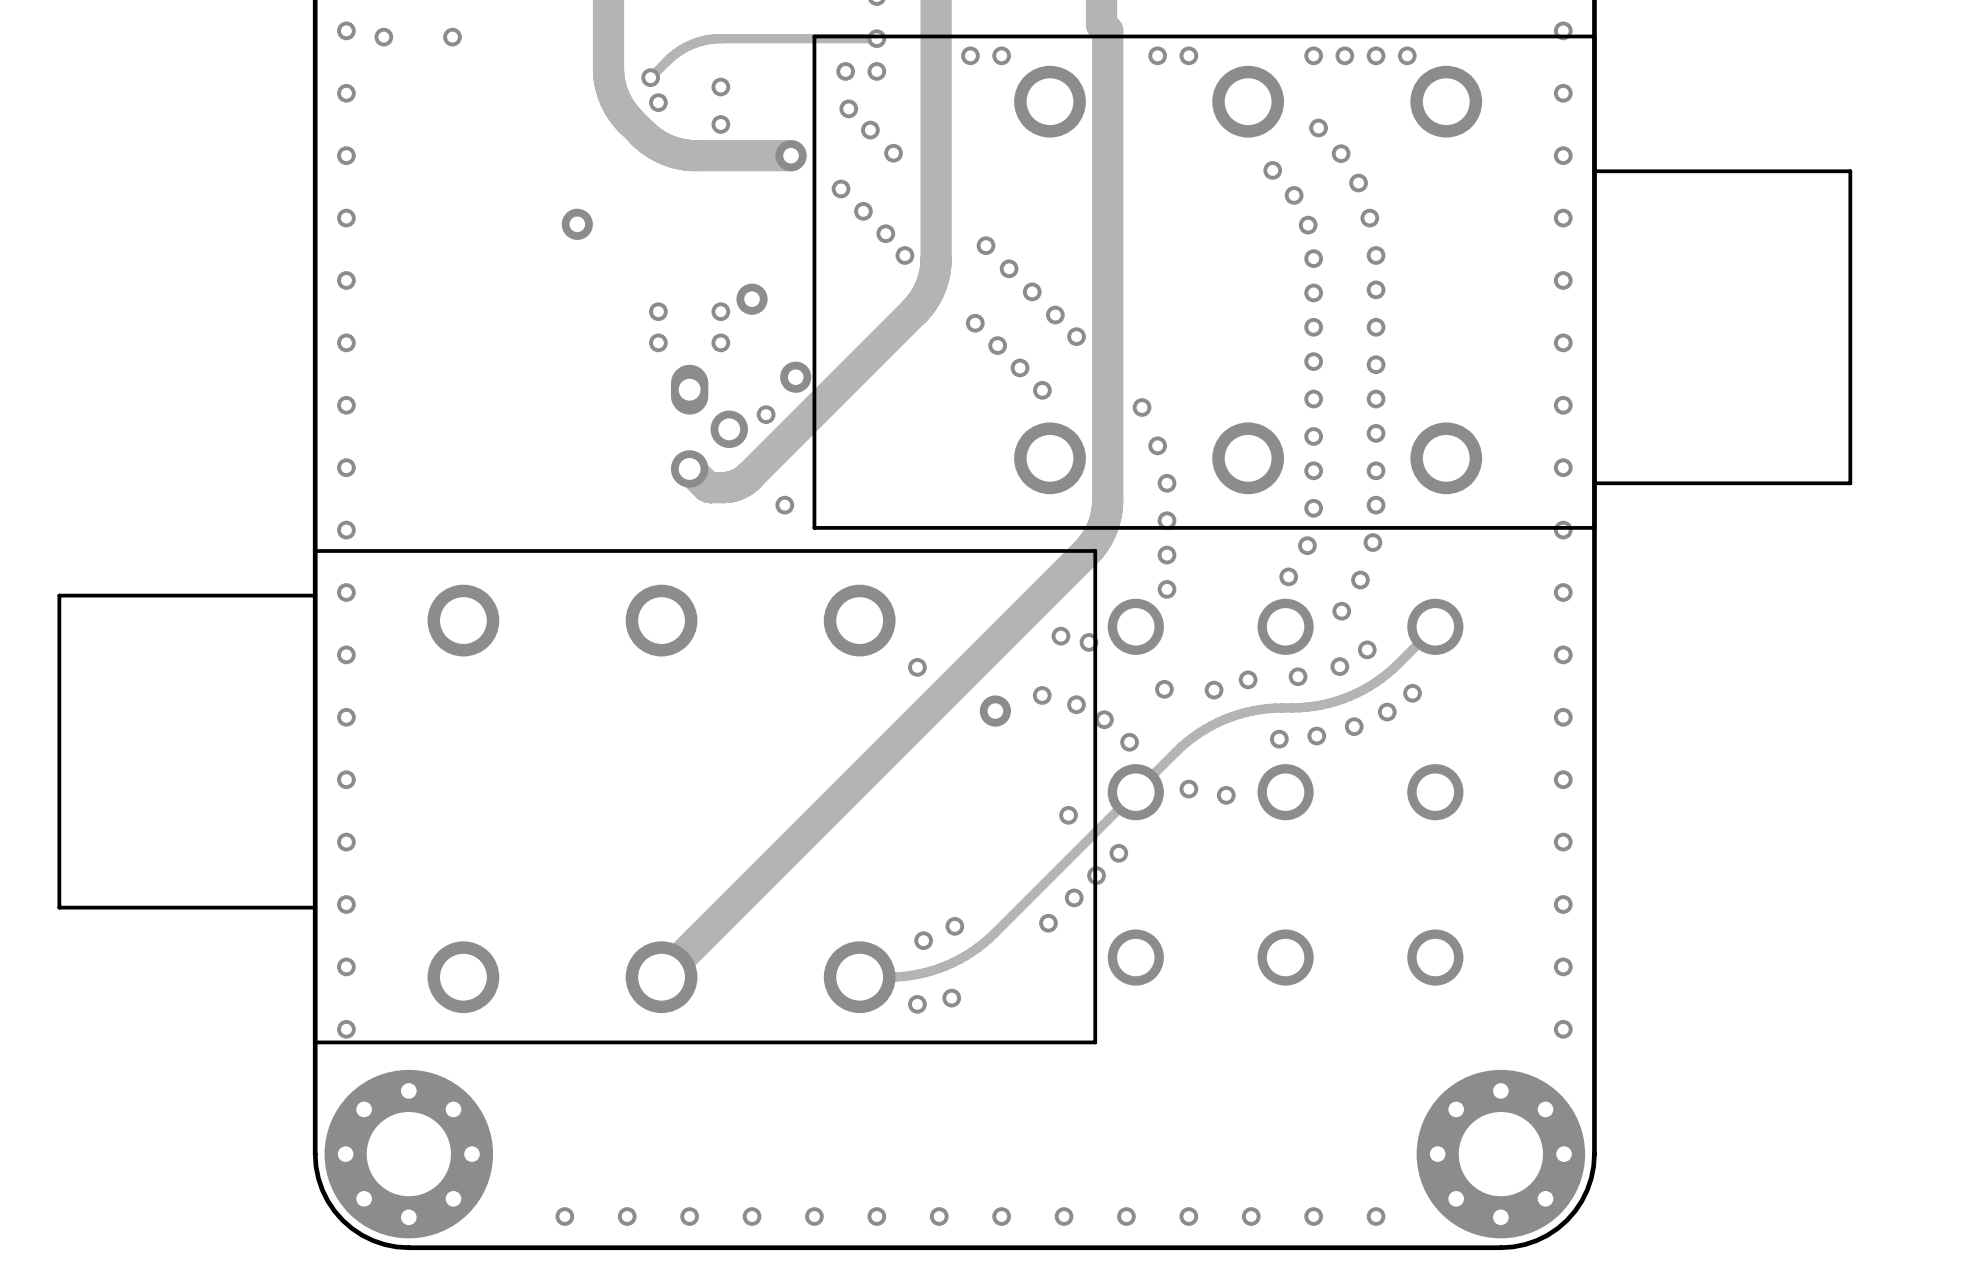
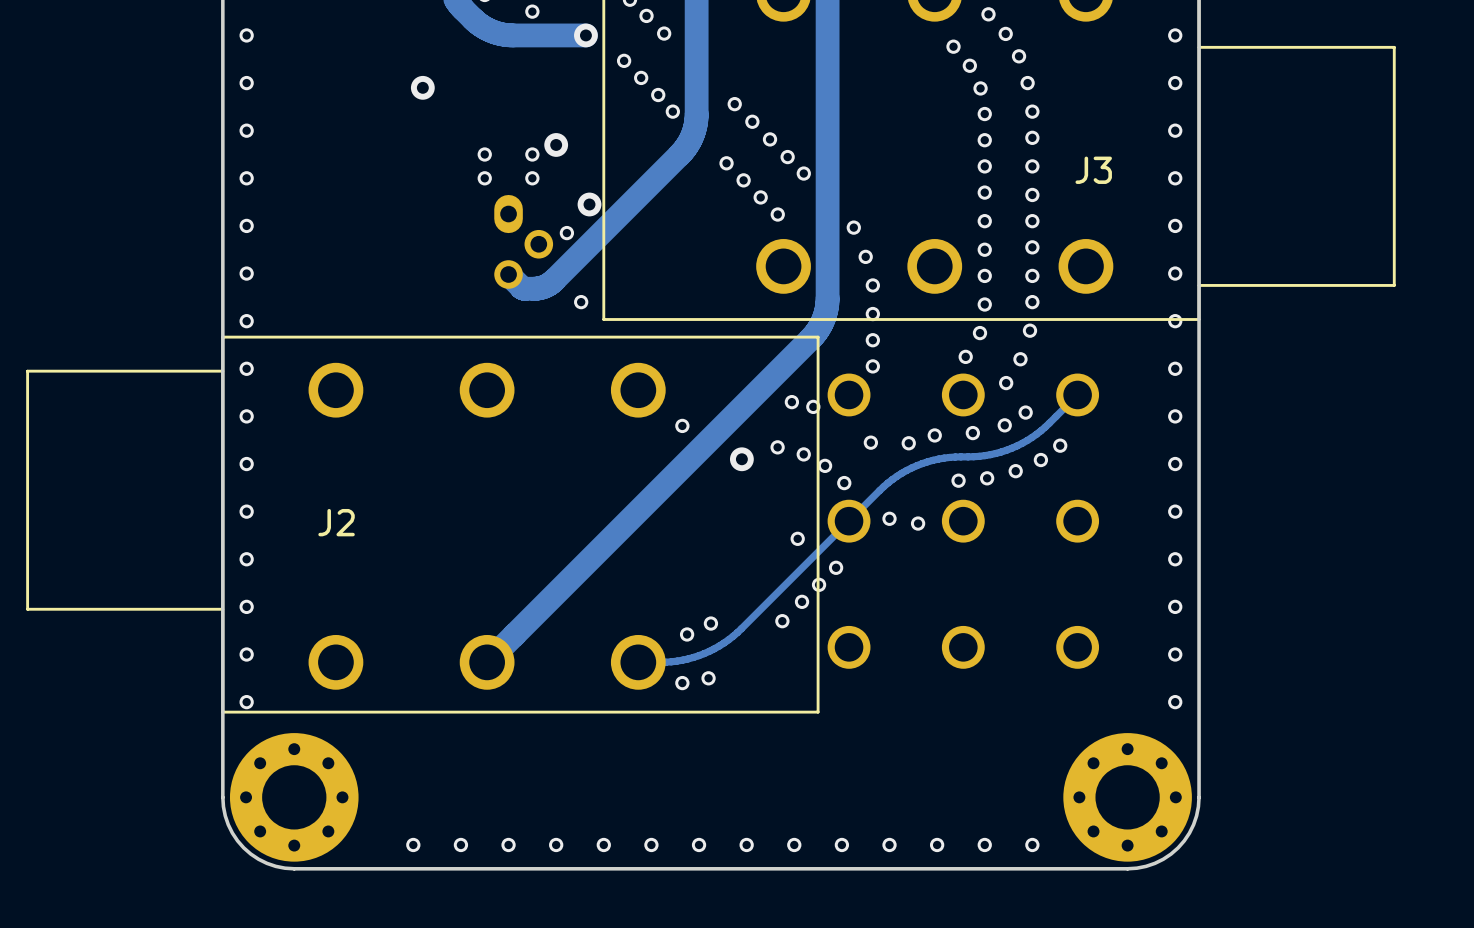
J3 name: none -> J3 (1093, 170)
J2 name: none -> J2 (336, 522)

